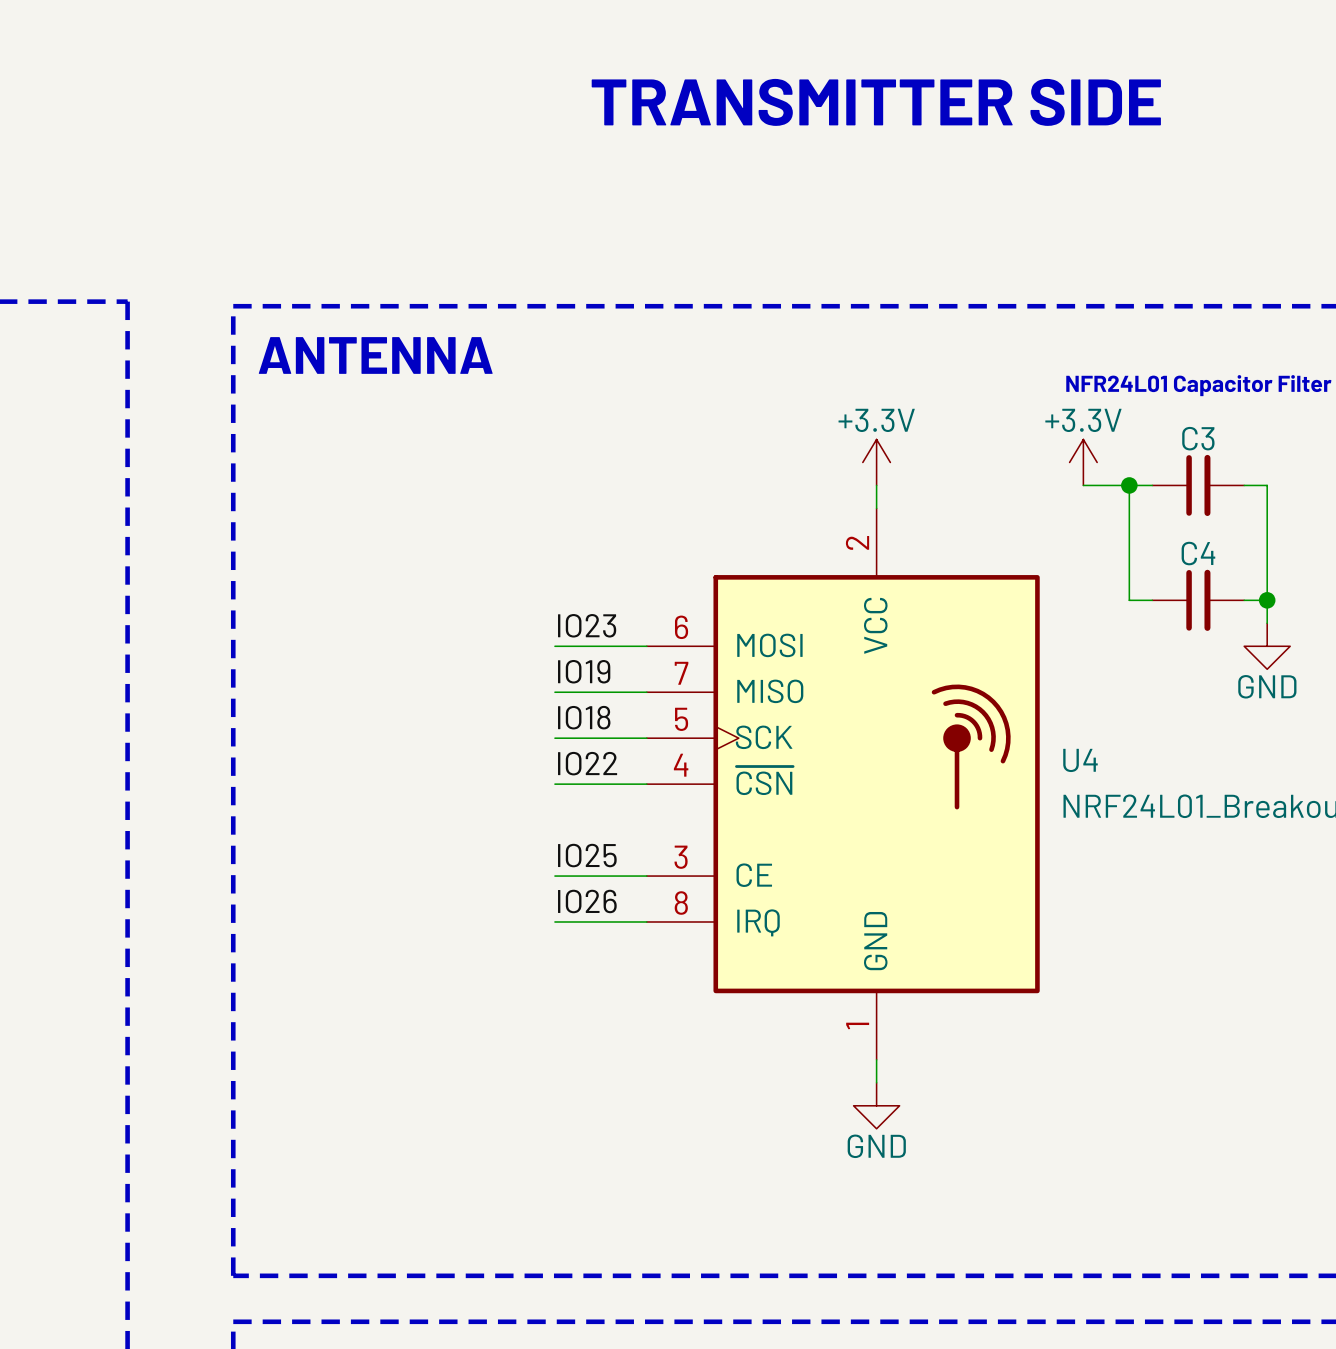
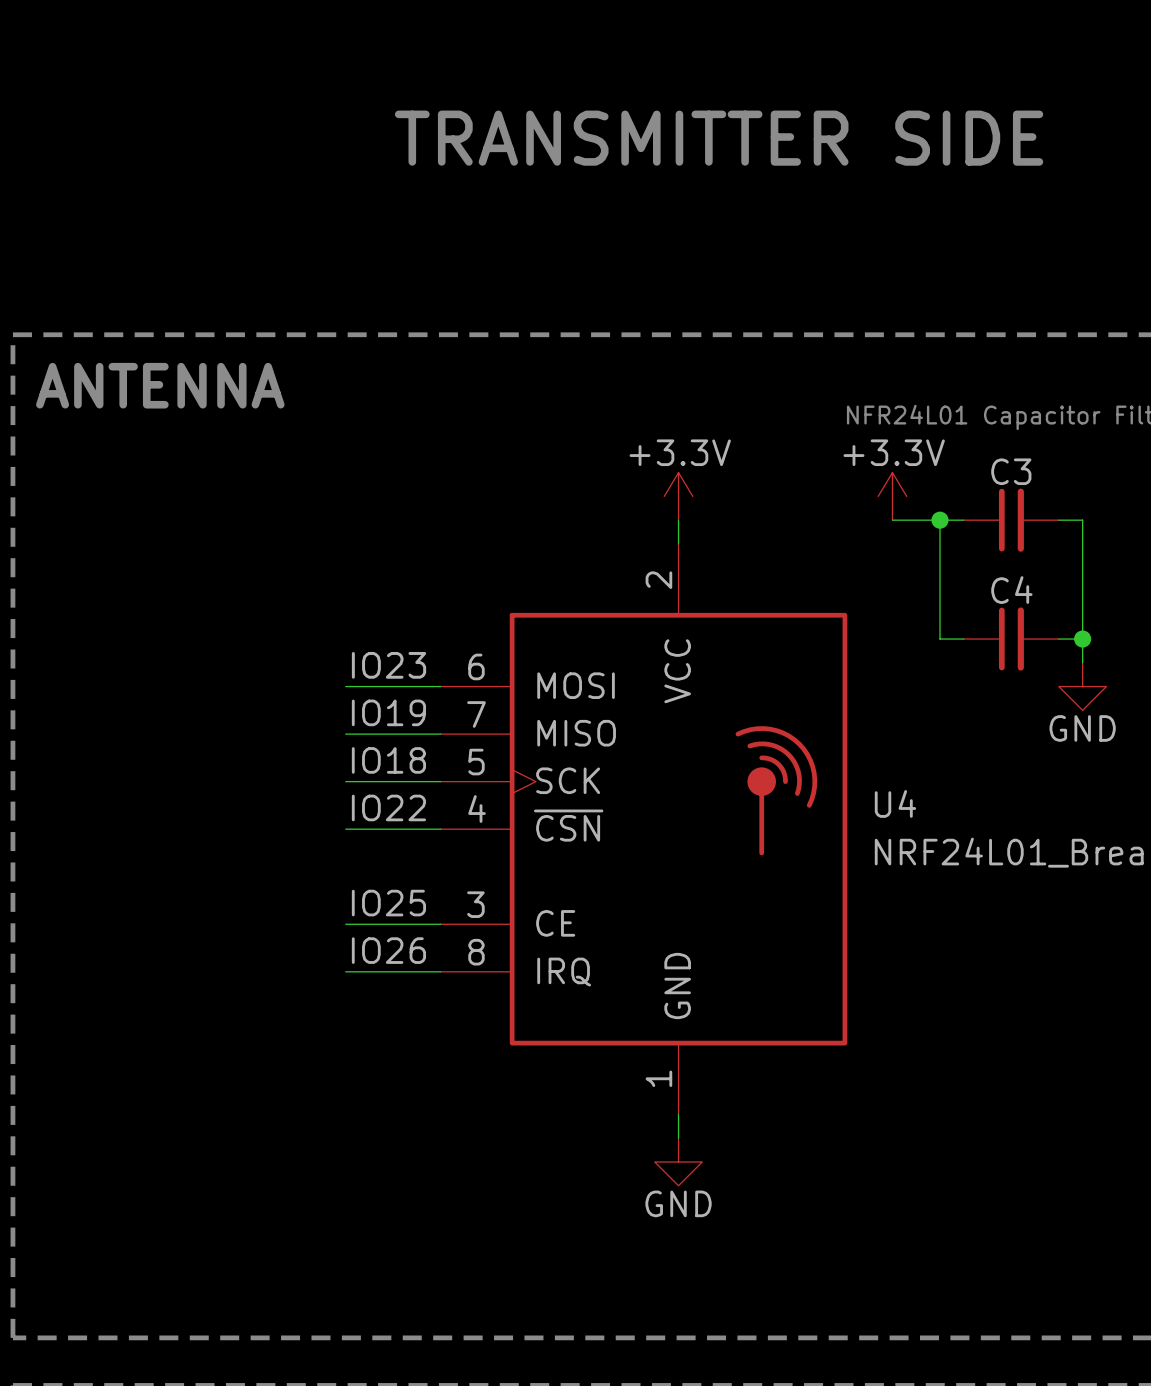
text position: TRANSMITTER SIDE (876, 102) -> TRANSMITTER SIDE (719, 138)

